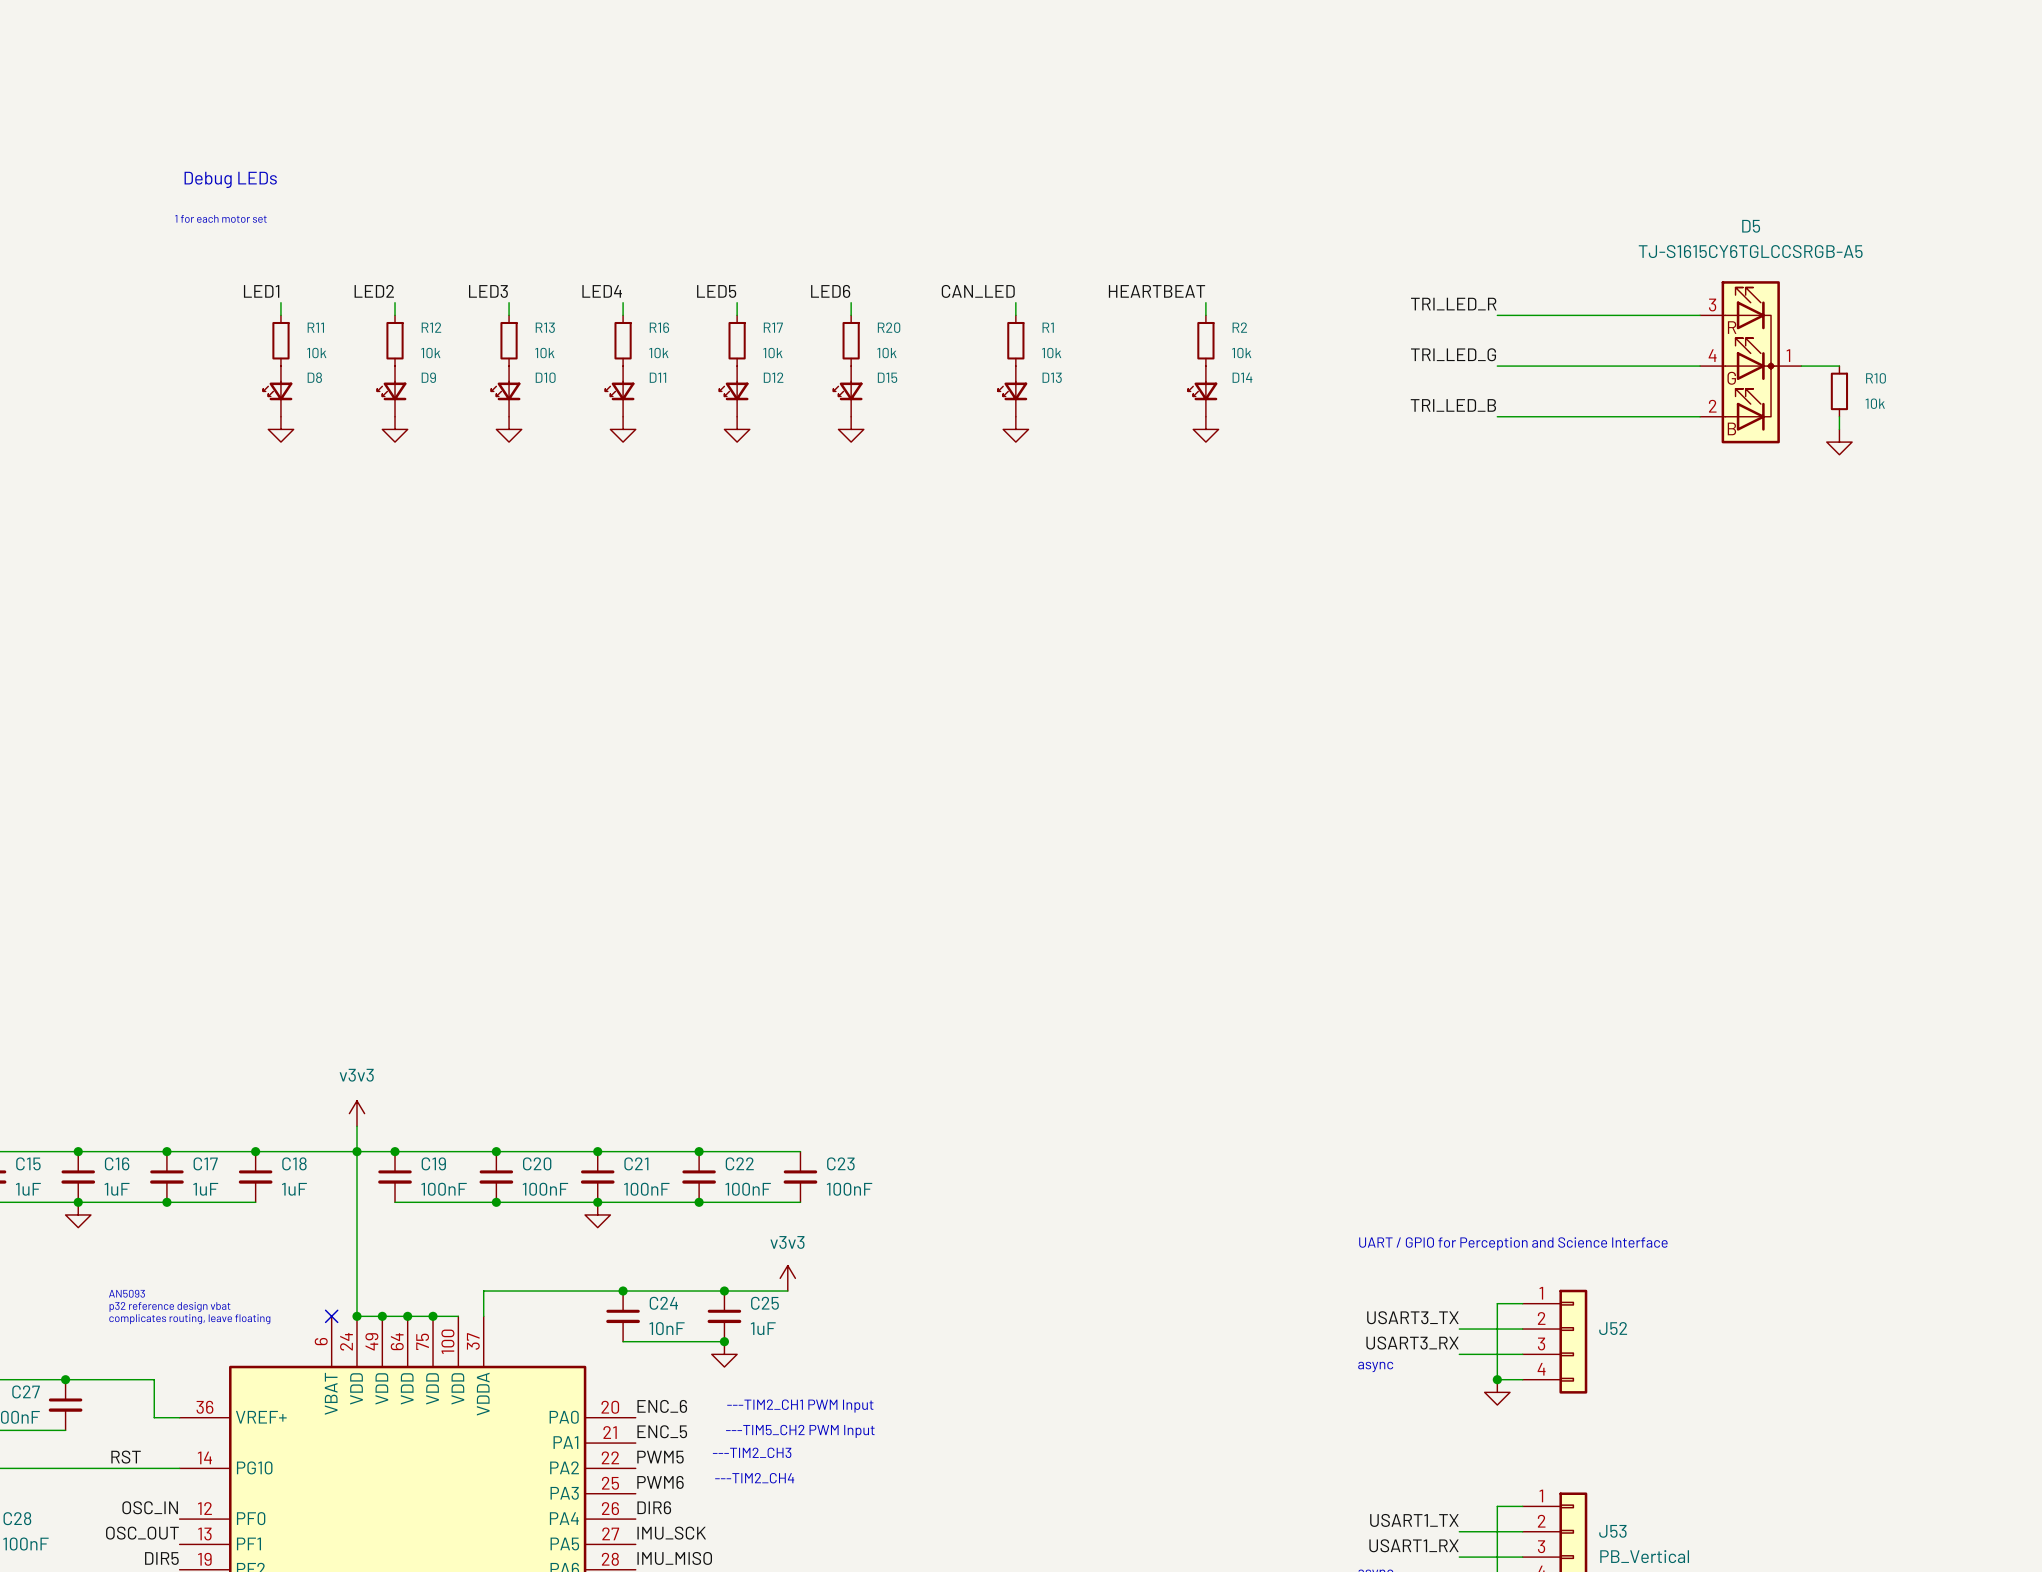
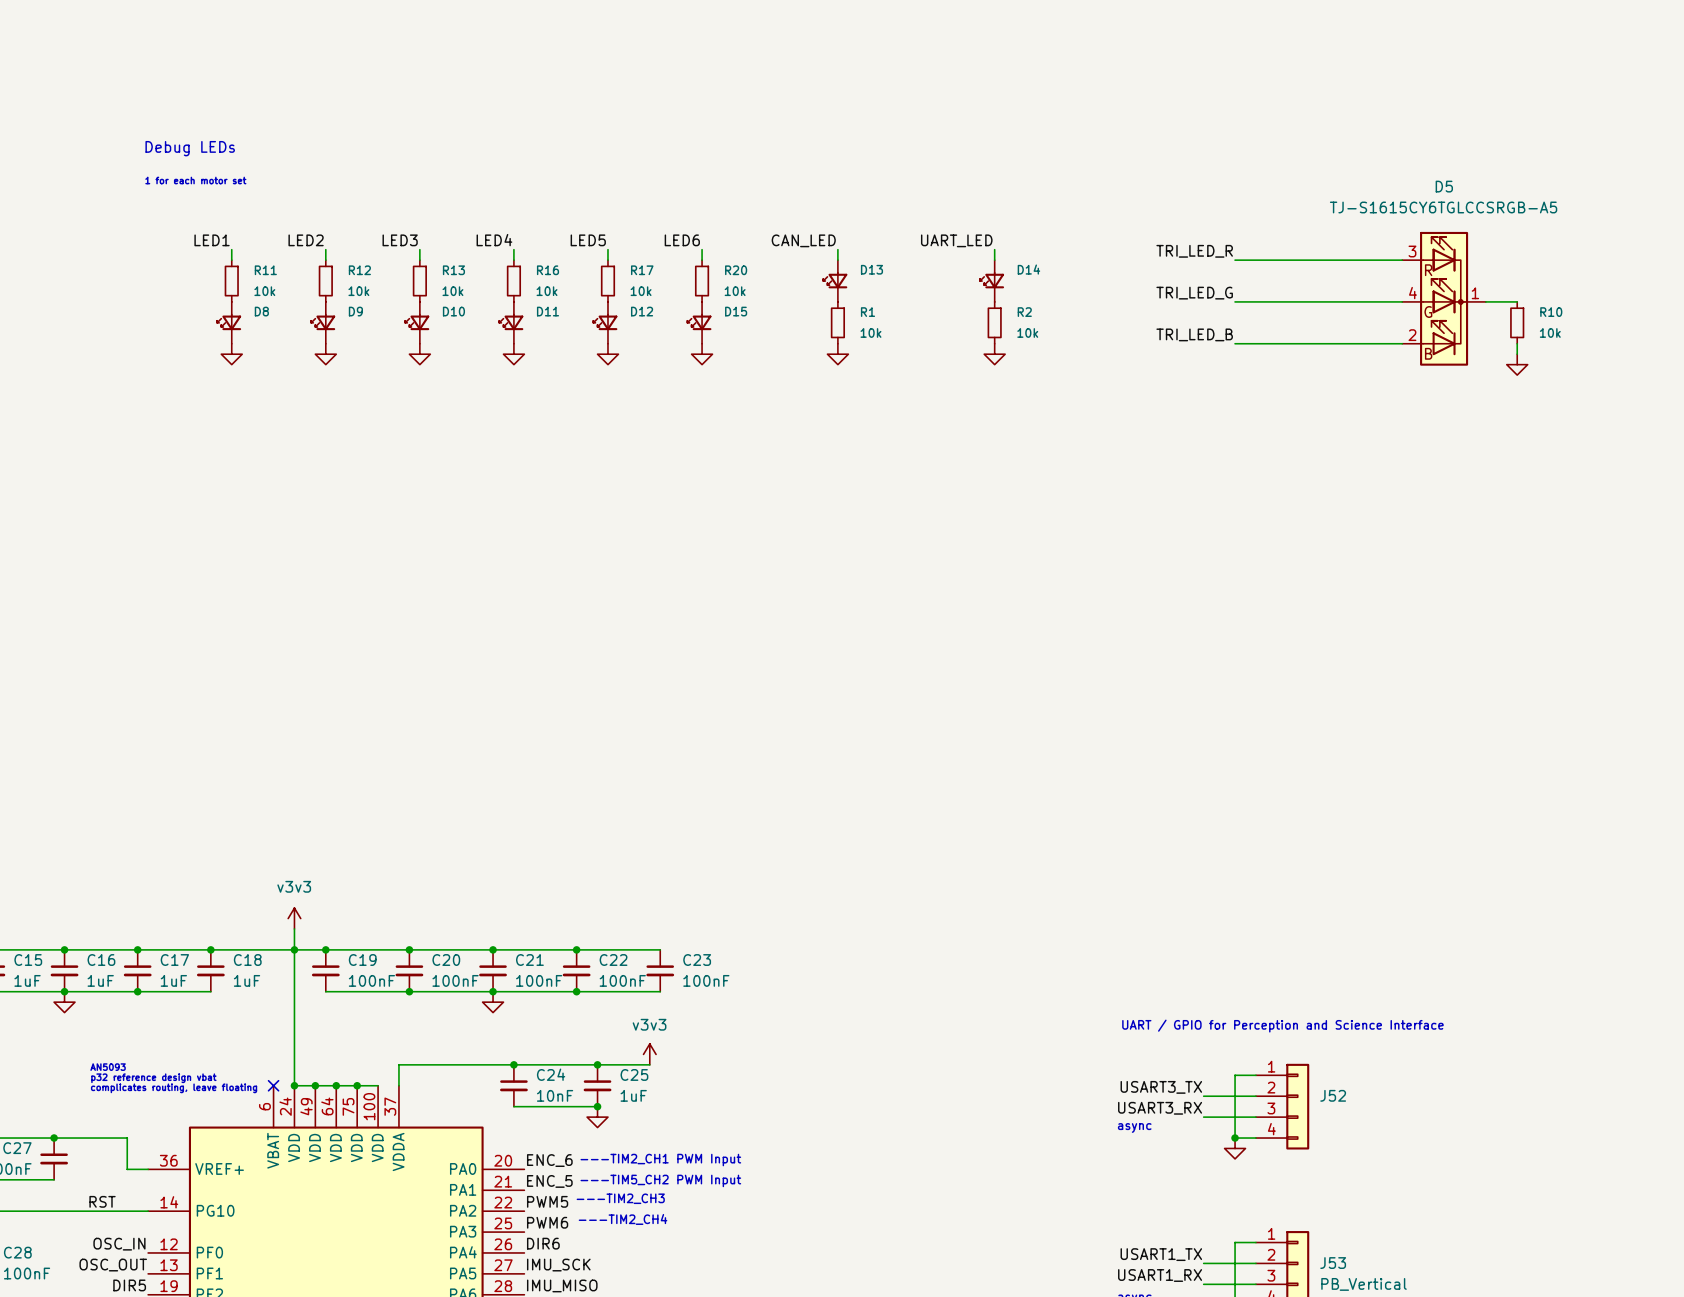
label: HEARTBEAT (1157, 291) -> UART_LED (956, 240)
R1 position: (1015, 340) -> (837, 322)
R2 position: (1205, 340) -> (994, 322)
D13 position: (1012, 391) -> (835, 281)
D14 position: (1202, 391) -> (992, 281)

